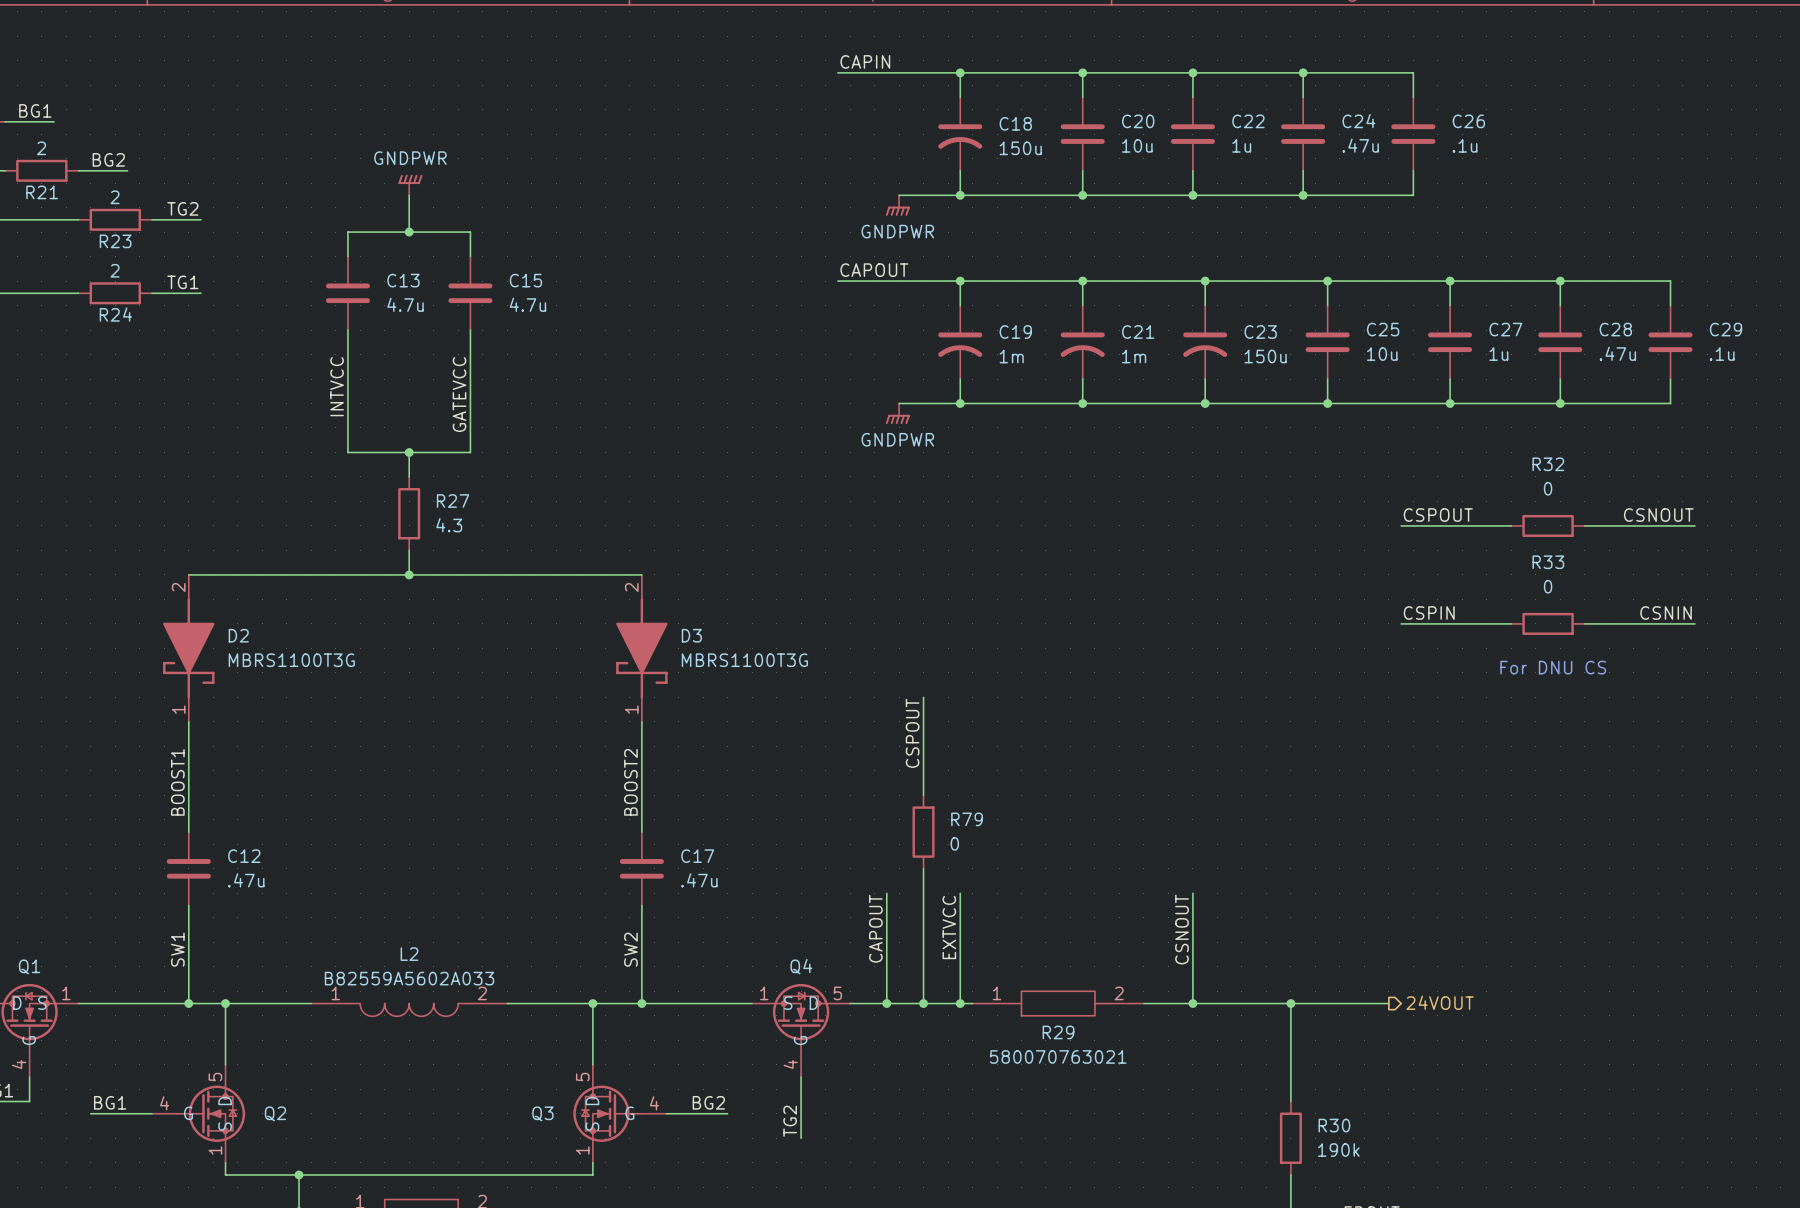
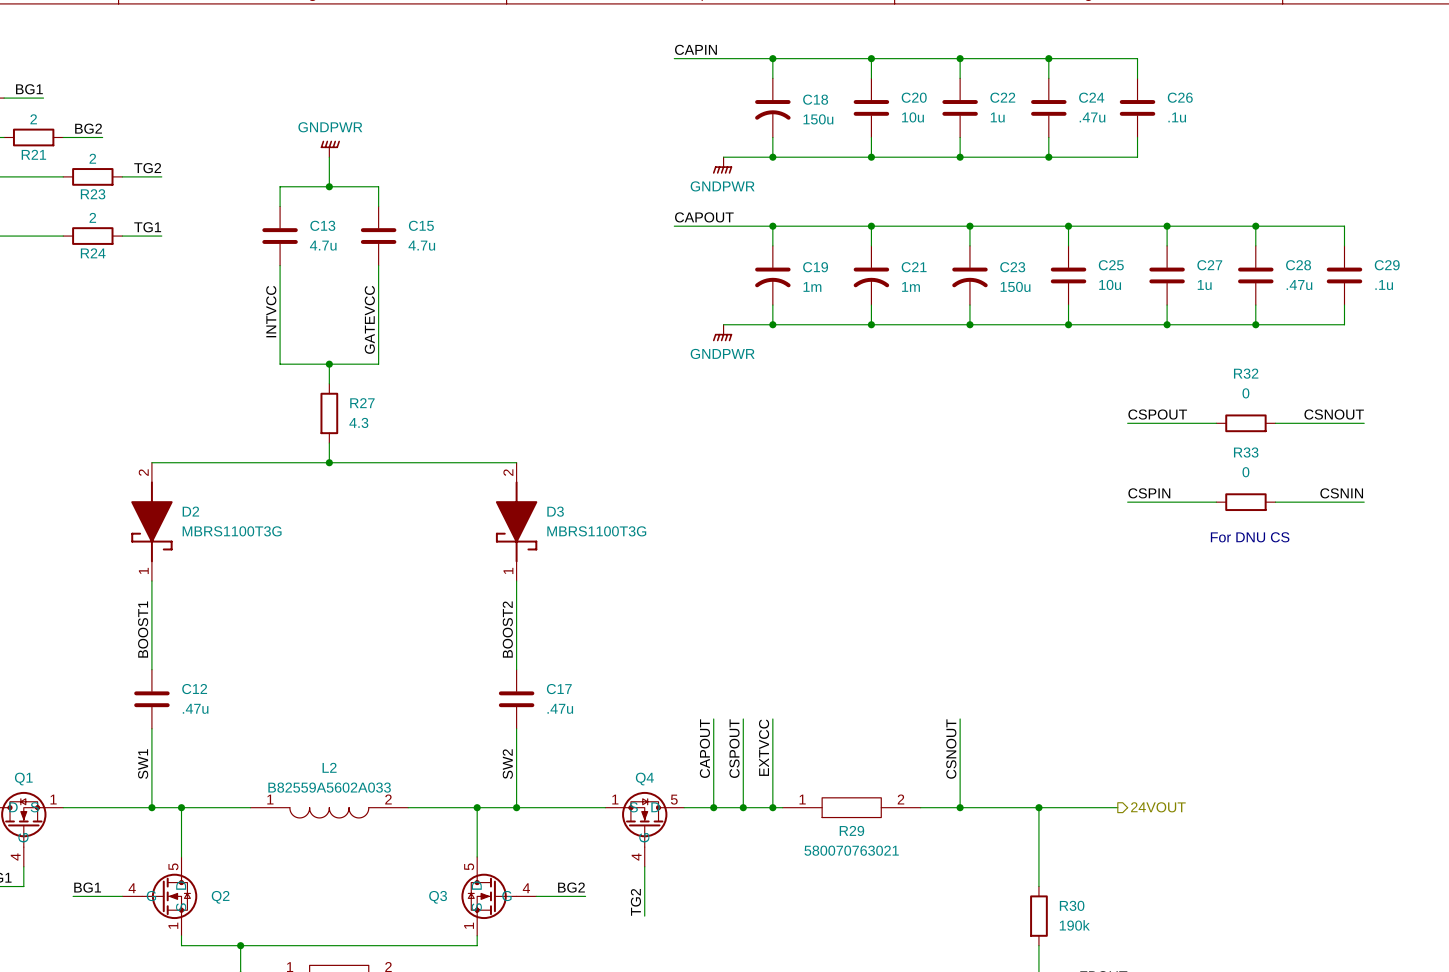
wire: (923, 697) (923, 795) -> none
label position: CSPOUT (912, 733) -> CSPOUT (734, 748)
R79: 0 (923, 832) -> none
wire: (923, 868) (923, 893) -> none

